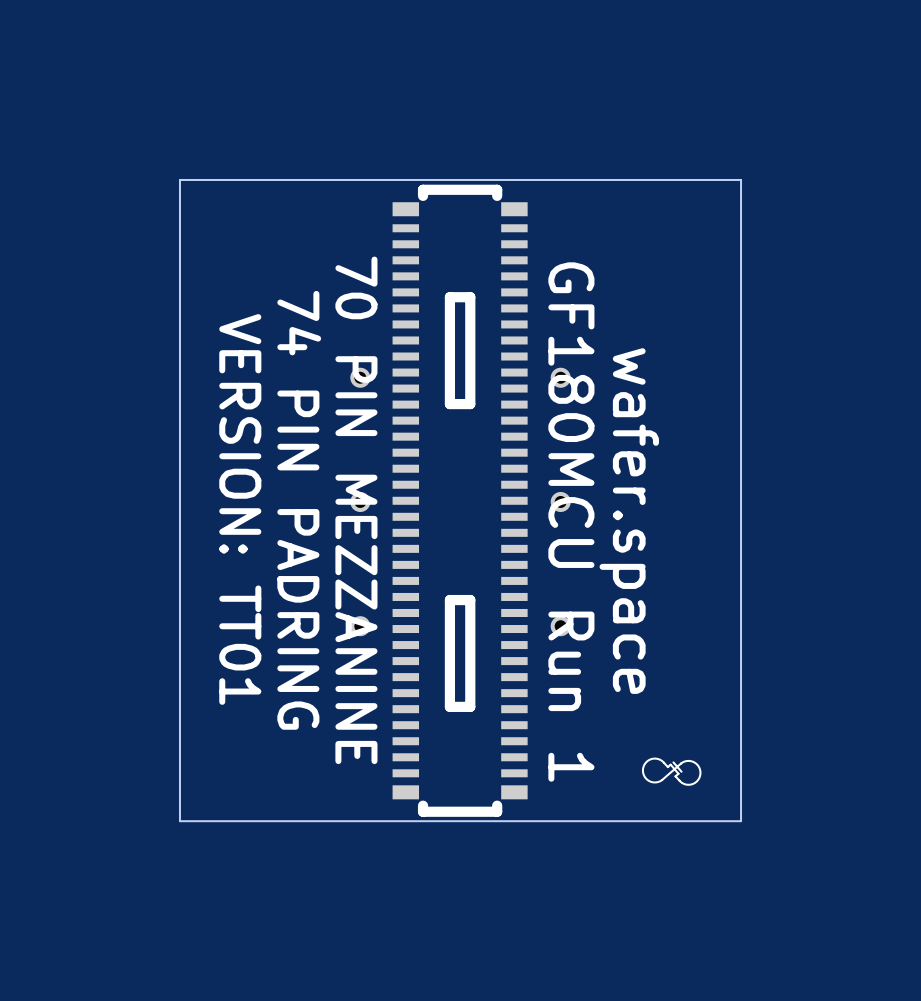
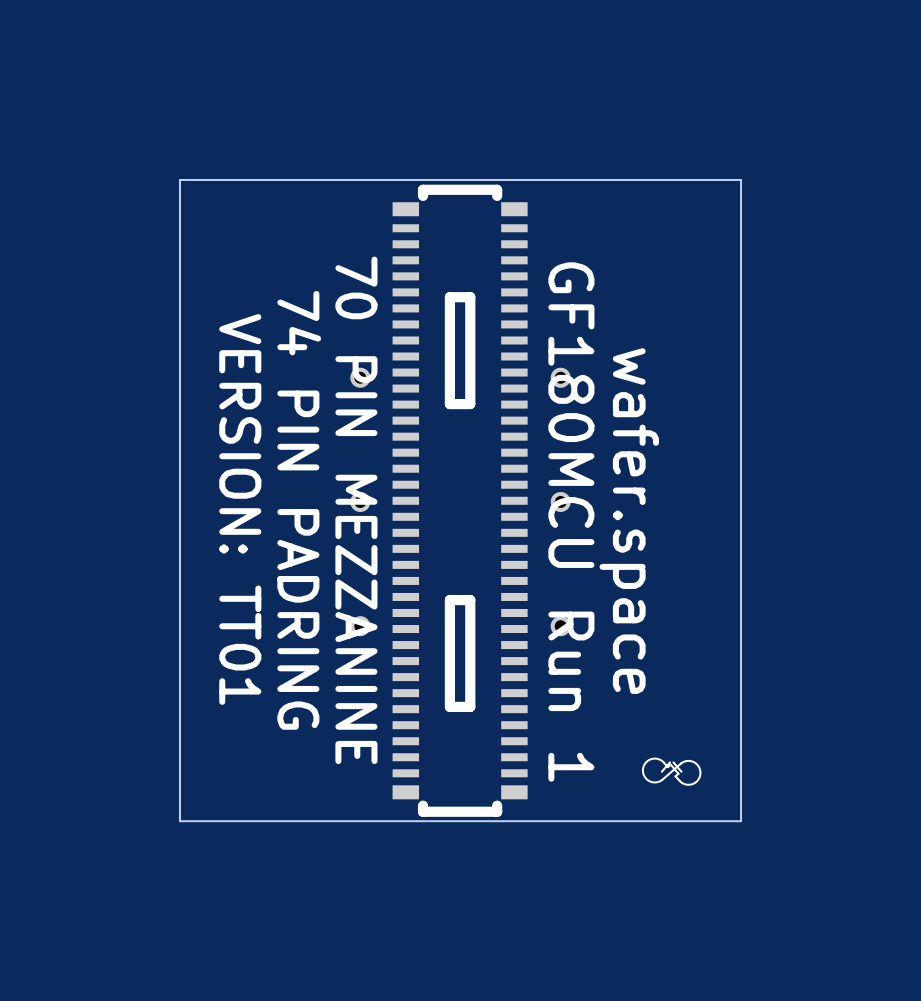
line: none -> (669, 762) (661, 771)

